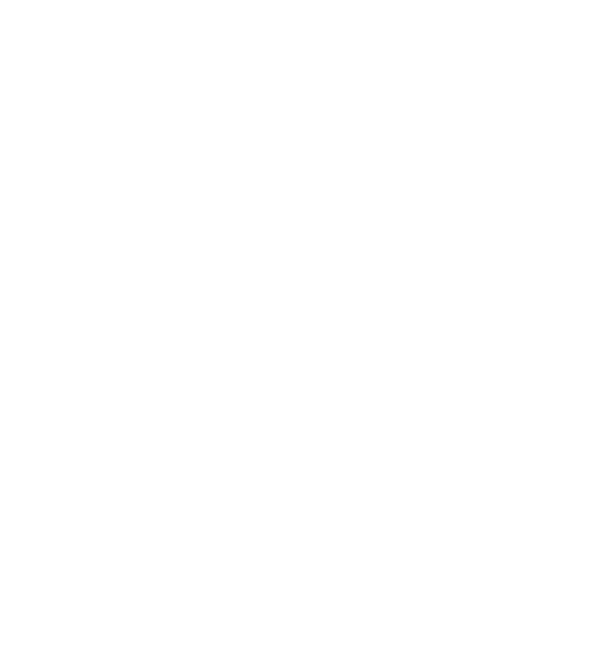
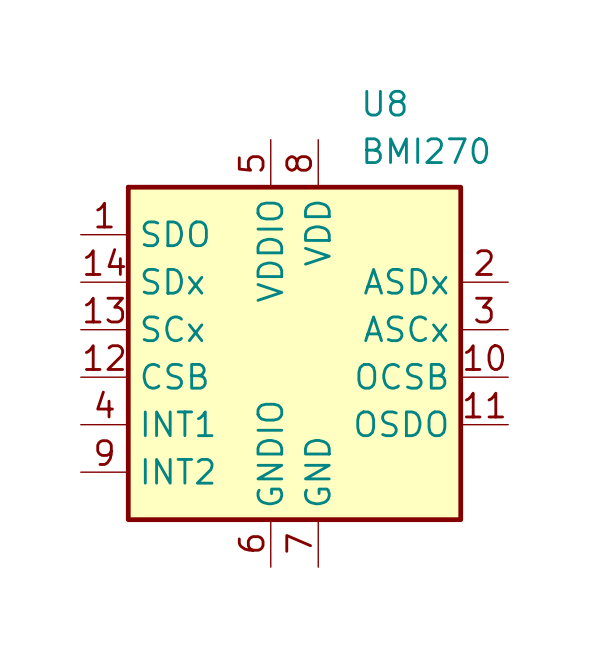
U8: none -> BMI270 (294, 353)

